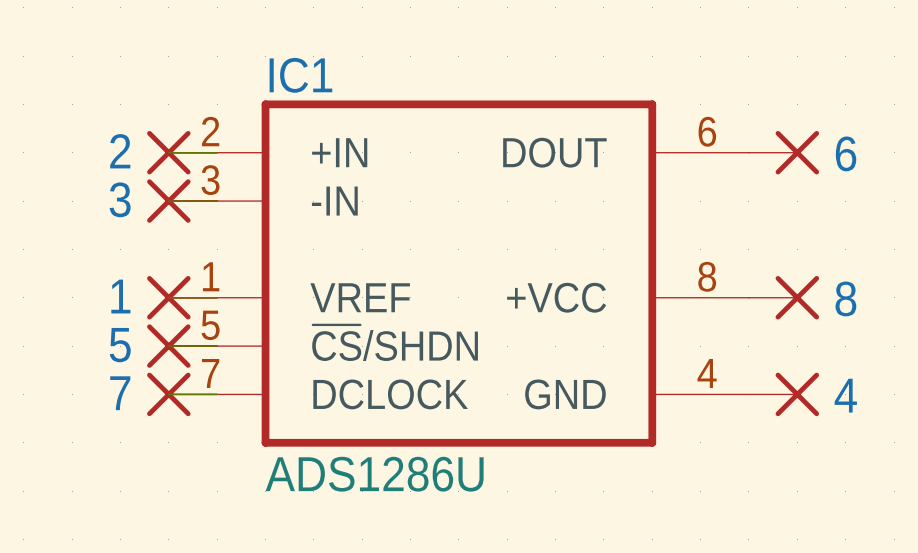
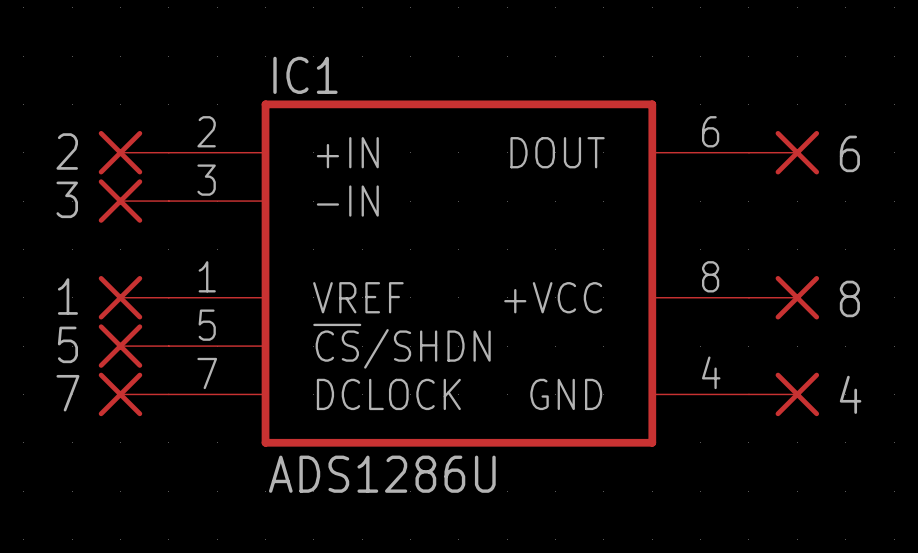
2 position: (182, 152) -> (133, 152)
3 position: (182, 201) -> (133, 201)
1 position: (182, 297) -> (133, 297)
5 position: (182, 346) -> (133, 346)
7 position: (182, 394) -> (133, 394)

